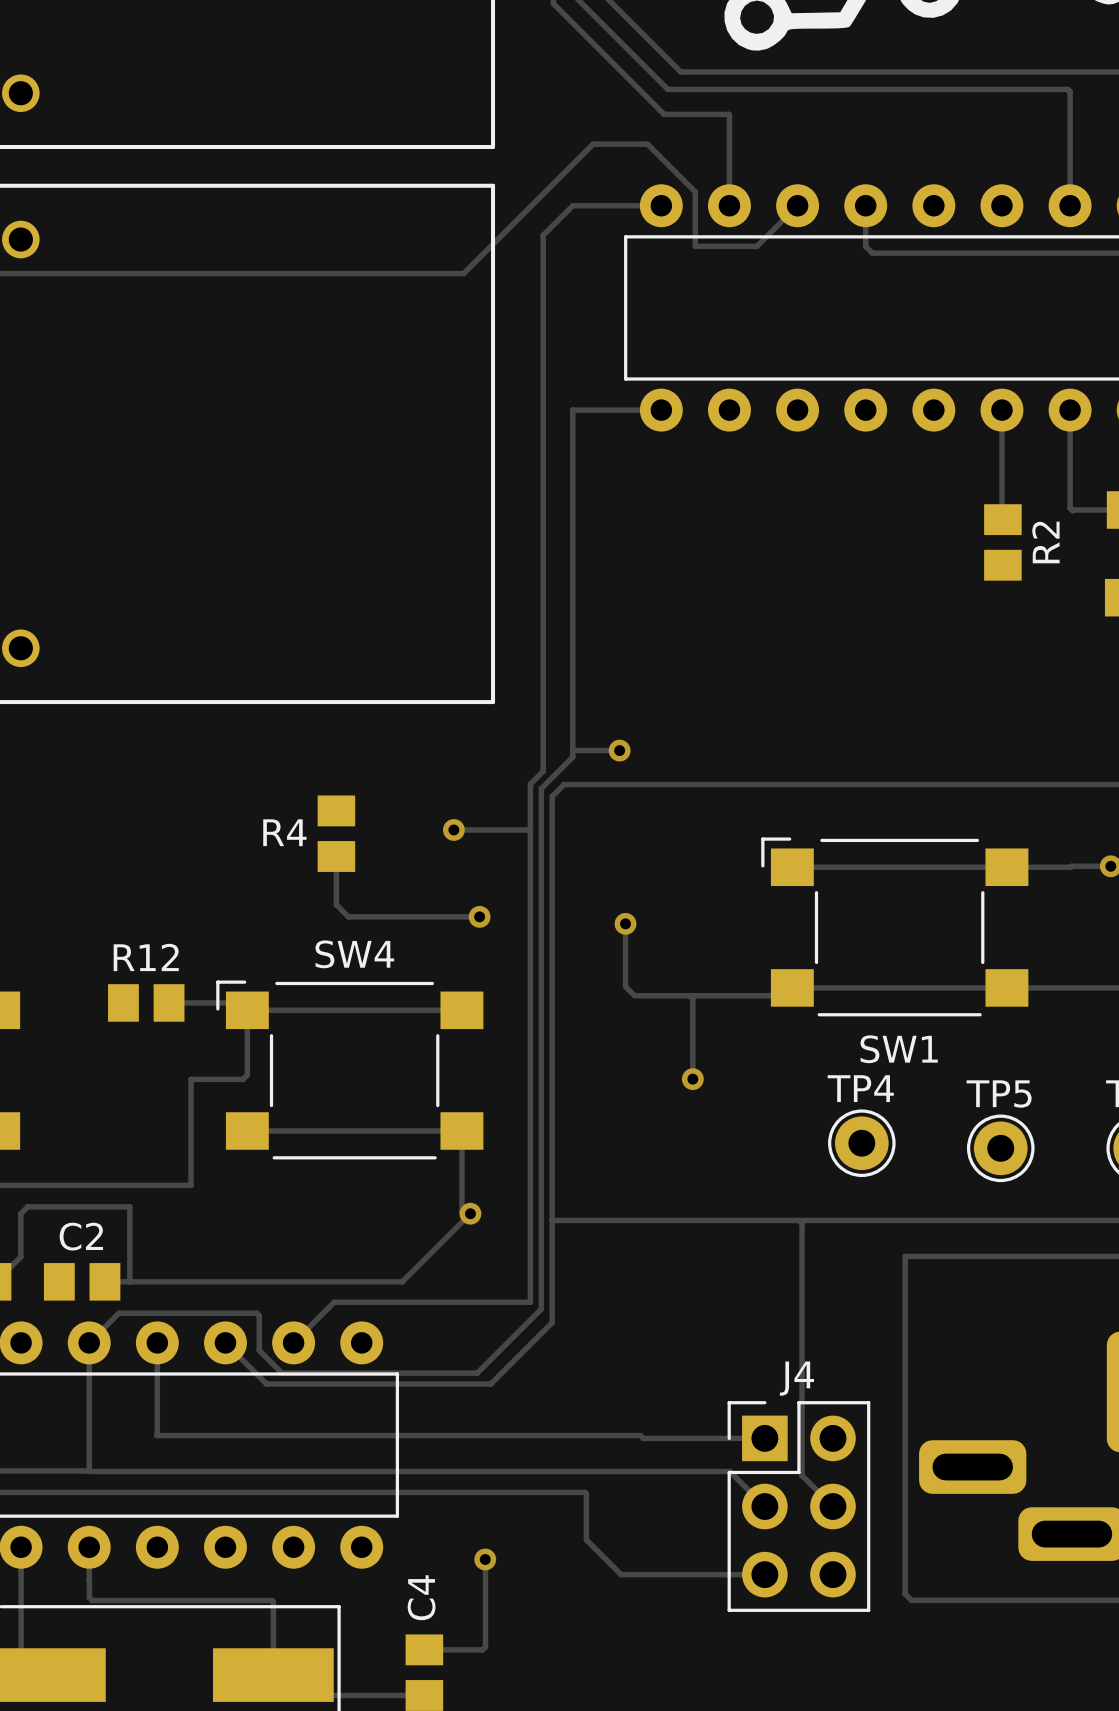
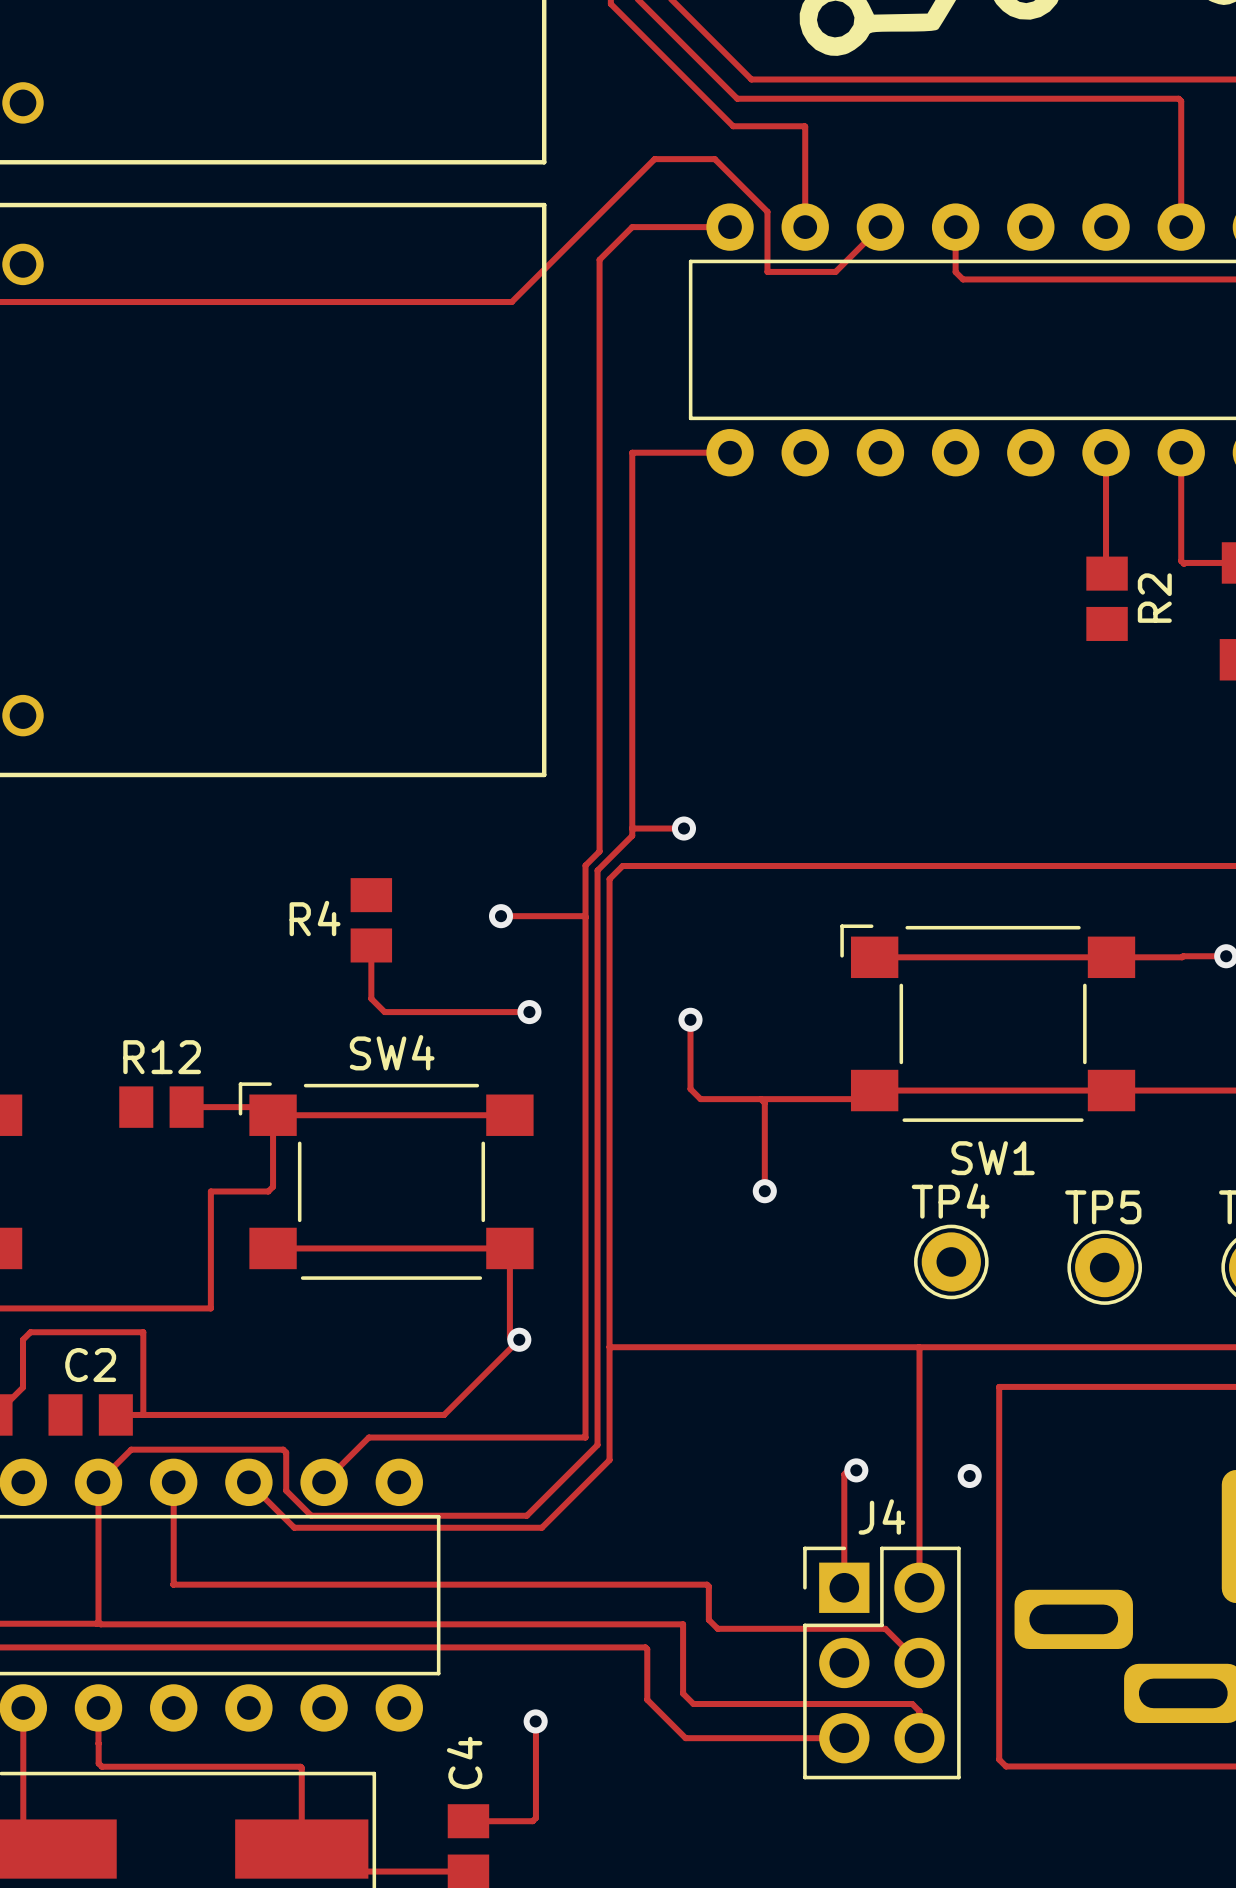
track: (798, 1220) (802, 1223) (802, 1475) -> none
track: none -> (919, 1347) (919, 1587)
track: none -> (856, 1470) (848, 1470) (844, 1474) (844, 1587)
via: none -> (856, 1470)
via: none -> (969, 1476)
track: (642, 1437) (764, 1438) -> (708, 1586) (708, 1619) (717, 1628) (885, 1628)
track: (618, 1471) (729, 1471) (764, 1506) -> (683, 1624) (683, 1693) (693, 1704) (912, 1704) (919, 1711) (919, 1738)

